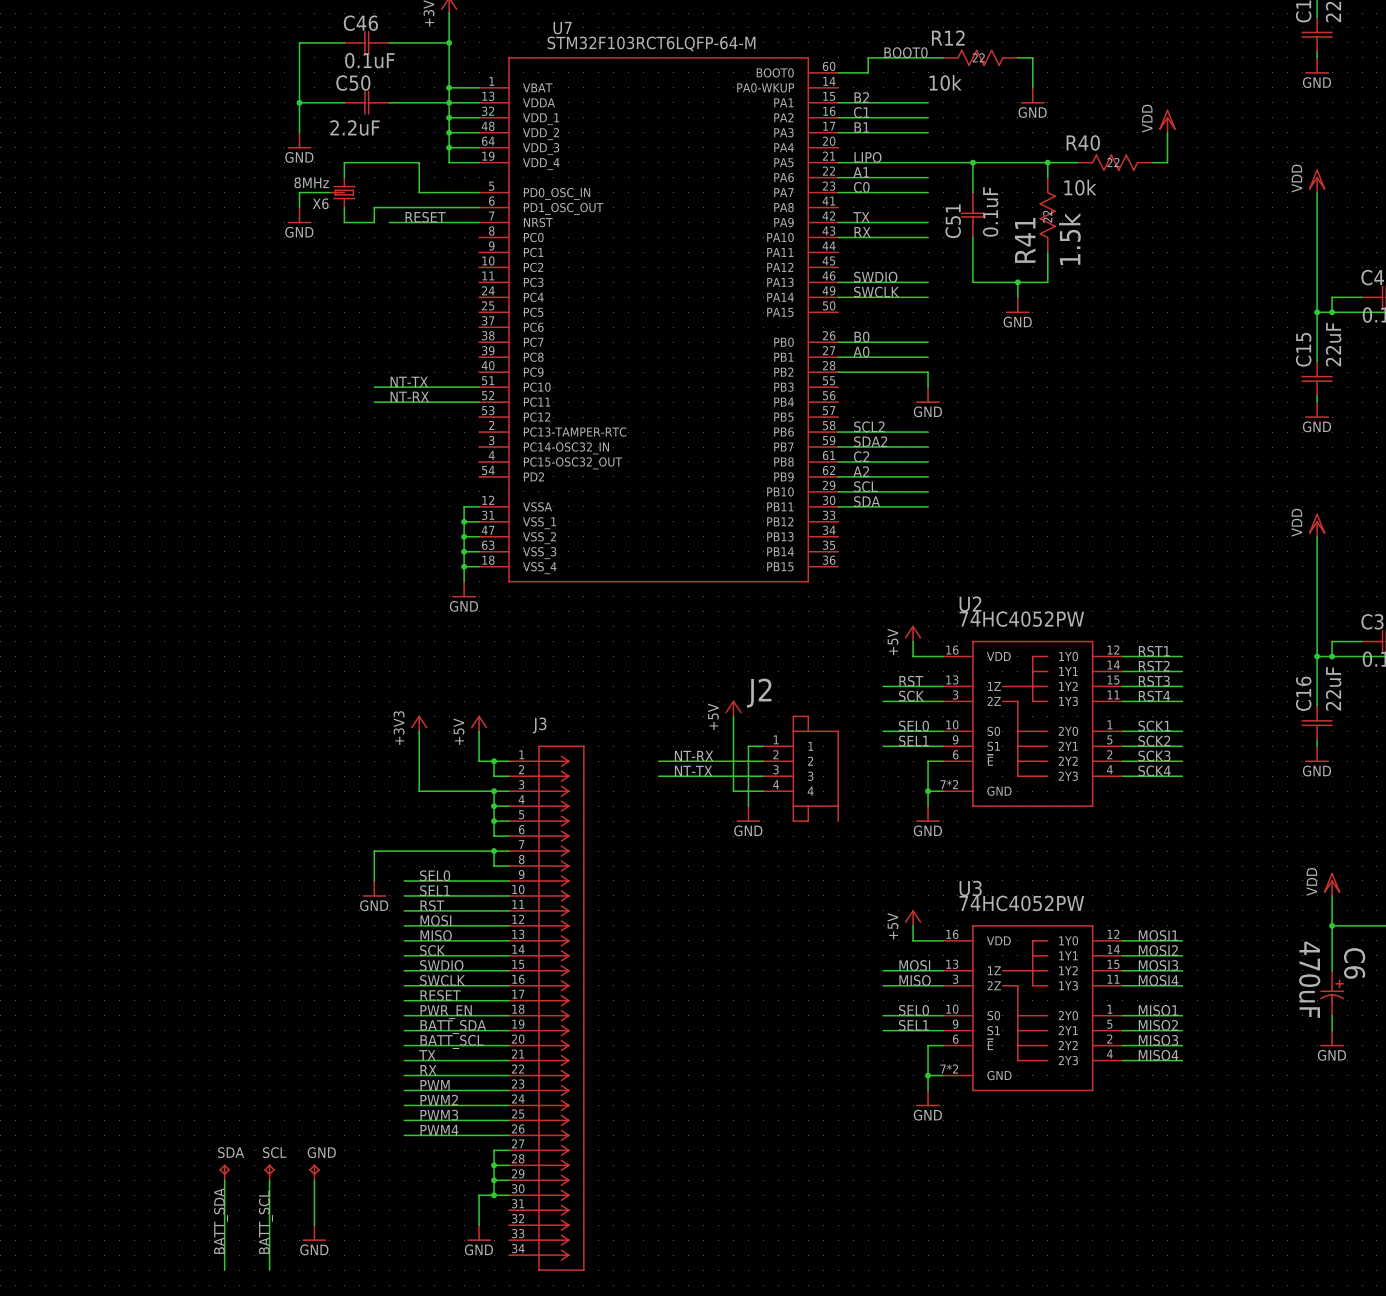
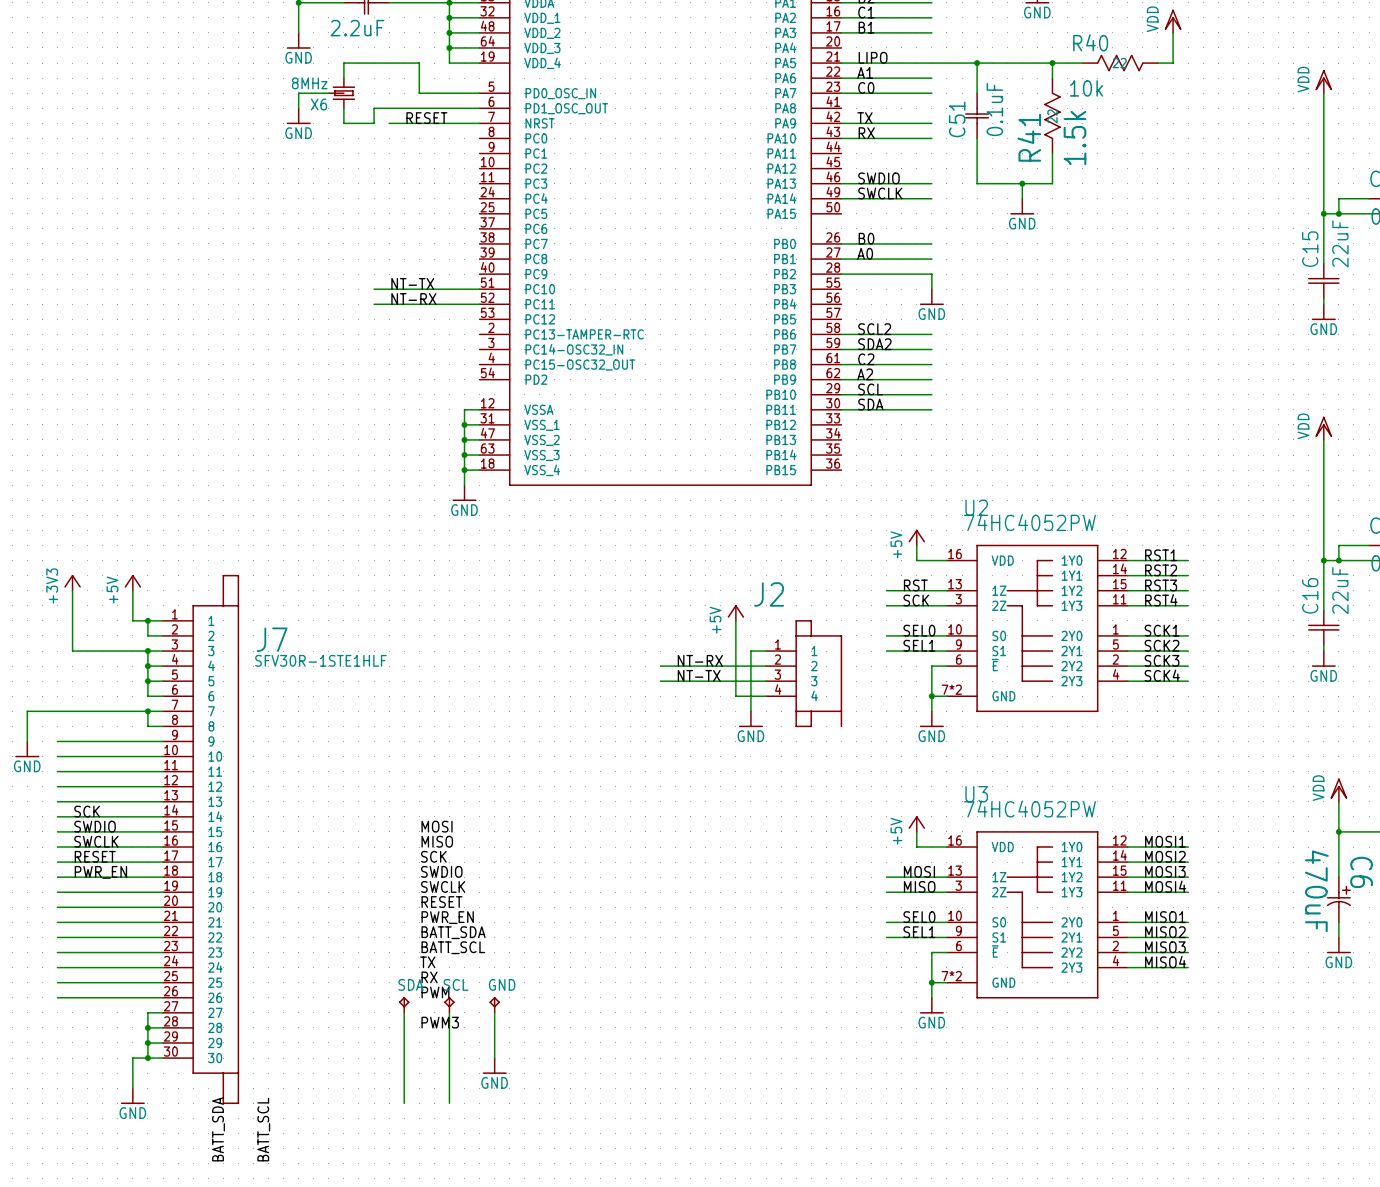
power symbol: none -> +3V3 (72, 582)
power symbol: none -> +5V (132, 582)
wire: none -> (72, 590) (72, 651) (163, 651)
wire: none -> (132, 590) (132, 620) (163, 620)
wire: none -> (147, 620) (147, 635) (163, 635)
junction: none -> (147, 620)
power symbol: +3V3 (419, 723) -> none
power symbol: +5V (479, 723) -> none
wire: (419, 731) (419, 791) (509, 791) -> none
wire: (479, 731) (479, 761) (509, 761) -> none
wire: none -> (147, 651) (147, 696) (163, 696)
junction: none -> (147, 651)
wire: none -> (147, 666) (163, 666)
junction: none -> (147, 666)
wire: (494, 761) (494, 776) (509, 776) -> none
junction: (494, 761) -> none
wire: none -> (147, 681) (163, 681)
junction: none -> (147, 681)
wire: (494, 791) (494, 836) (509, 836) -> none
junction: (494, 791) -> none
wire: none -> (147, 711) (147, 726) (163, 726)
junction: none -> (147, 711)
wire: none -> (163, 711) (27, 711) (27, 741)
wire: (494, 806) (509, 806) -> none
junction: (494, 806) -> none
wire: (494, 821) (509, 821) -> none
junction: (494, 821) -> none
wire: none -> (57, 741) (163, 741)
power symbol: none -> GND (27, 749)
wire: none -> (57, 756) (163, 756)
wire: (494, 851) (494, 866) (509, 866) -> none
junction: (494, 851) -> none
wire: (509, 851) (374, 851) (374, 880) -> none
wire: none -> (57, 771) (163, 771)
label: SEL0 (435, 875) -> none
wire: none -> (57, 786) (163, 786)
wire: (404, 880) (509, 880) -> none
power symbol: GND (374, 888) -> none
label: SEL1 (434, 890) -> none
wire: none -> (57, 801) (163, 801)
wire: (404, 895) (509, 895) -> none
label: none -> SCK (87, 811)
label: RST (432, 905) -> none
wire: none -> (57, 816) (163, 816)
wire: (404, 910) (509, 910) -> none
label: none -> SWDIO (95, 826)
wire: none -> (57, 831) (163, 831)
wire: (404, 925) (509, 925) -> none
J7: none -> SFV30R-1STE1HLF (201, 839)
label: none -> SWCLK (96, 841)
wire: none -> (57, 847) (163, 847)
wire: (404, 940) (509, 940) -> none
label: none -> RESET (95, 856)
wire: none -> (57, 862) (163, 862)
wire: (404, 955) (509, 955) -> none
label: none -> PWR_EN (100, 872)
wire: none -> (57, 877) (163, 877)
wire: (404, 970) (509, 970) -> none
wire: none -> (57, 892) (163, 892)
wire: (404, 985) (509, 985) -> none
wire: none -> (57, 907) (163, 907)
wire: (404, 1000) (509, 1000) -> none
J3: (546, 1008) -> none
wire: none -> (57, 922) (163, 922)
wire: (404, 1015) (509, 1015) -> none
wire: none -> (57, 937) (163, 937)
wire: (404, 1030) (509, 1030) -> none
wire: none -> (57, 952) (163, 952)
wire: (404, 1045) (509, 1045) -> none
wire: none -> (57, 967) (163, 967)
wire: (404, 1060) (509, 1060) -> none
wire: none -> (57, 982) (163, 982)
wire: (404, 1075) (509, 1075) -> none
wire: none -> (57, 997) (163, 997)
wire: (404, 1090) (509, 1090) -> none
SDA: none -> (404, 1004)
SCL: none -> (449, 1004)
GND: none -> (494, 1004)
label: PWM2 (439, 1100) -> none
wire: none -> (163, 1012) (147, 1012) (147, 1058)
wire: (404, 1105) (509, 1105) -> (404, 1012) (404, 1103)
wire: none -> (449, 1012) (449, 1103)
wire: none -> (494, 1012) (494, 1058)
wire: none -> (147, 1027) (163, 1027)
junction: none -> (147, 1027)
wire: (404, 1120) (509, 1120) -> none
label: PWM4 (439, 1130) -> none
wire: none -> (147, 1042) (163, 1042)
junction: none -> (147, 1042)
wire: (404, 1135) (509, 1135) -> none
junction: none -> (147, 1058)
wire: none -> (163, 1058) (132, 1058) (132, 1088)
wire: (509, 1150) (494, 1150) (494, 1195) -> none
junction: (494, 1165) -> none
SDA: (224, 1172) -> none
SCL: (269, 1172) -> none
GND: (314, 1172) -> none
wire: (224, 1180) (224, 1270) -> none
wire: (269, 1180) (269, 1270) -> none
wire: (314, 1180) (314, 1225) -> none
wire: (494, 1180) (509, 1180) -> none
junction: (494, 1180) -> none
power symbol: none -> GND (132, 1096)
junction: (494, 1195) -> none
wire: (509, 1195) (479, 1195) (479, 1225) -> none
power symbol: GND (314, 1233) -> none
power symbol position: GND (479, 1233) -> GND (494, 1065)

